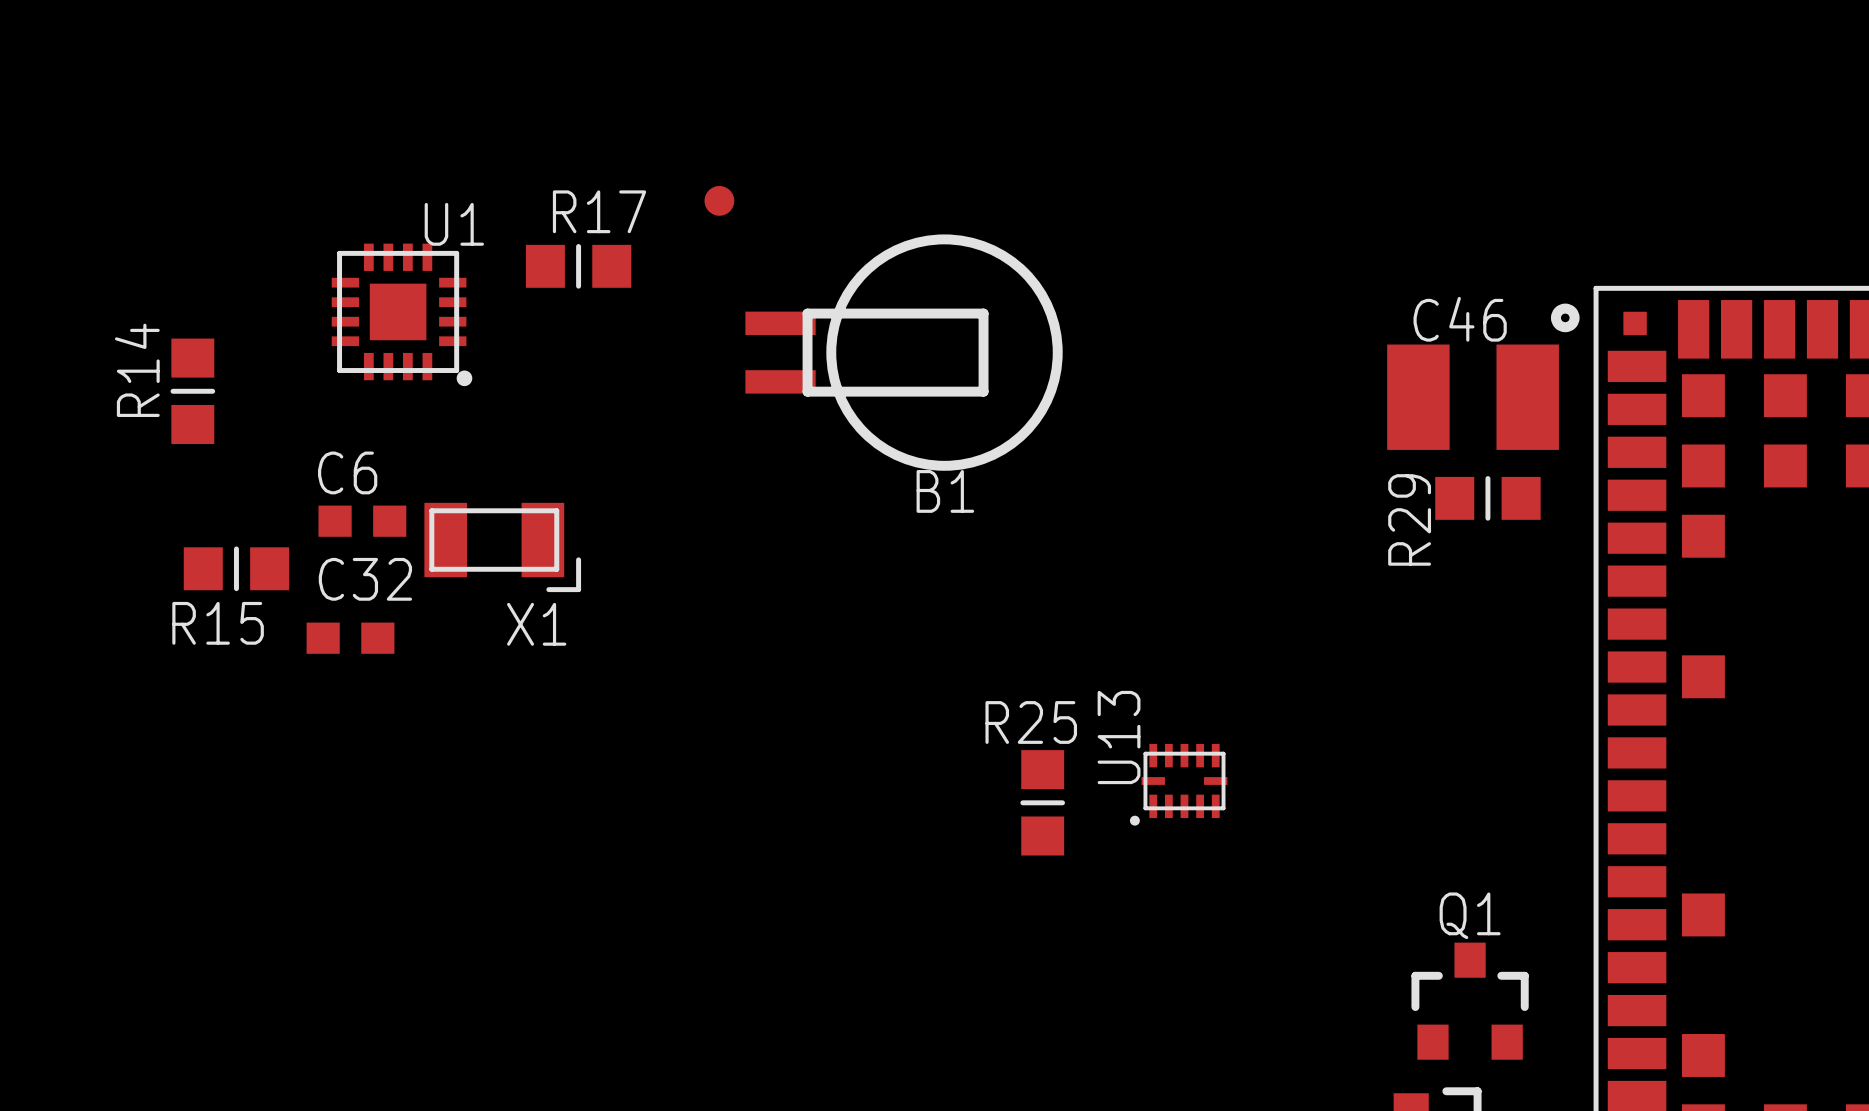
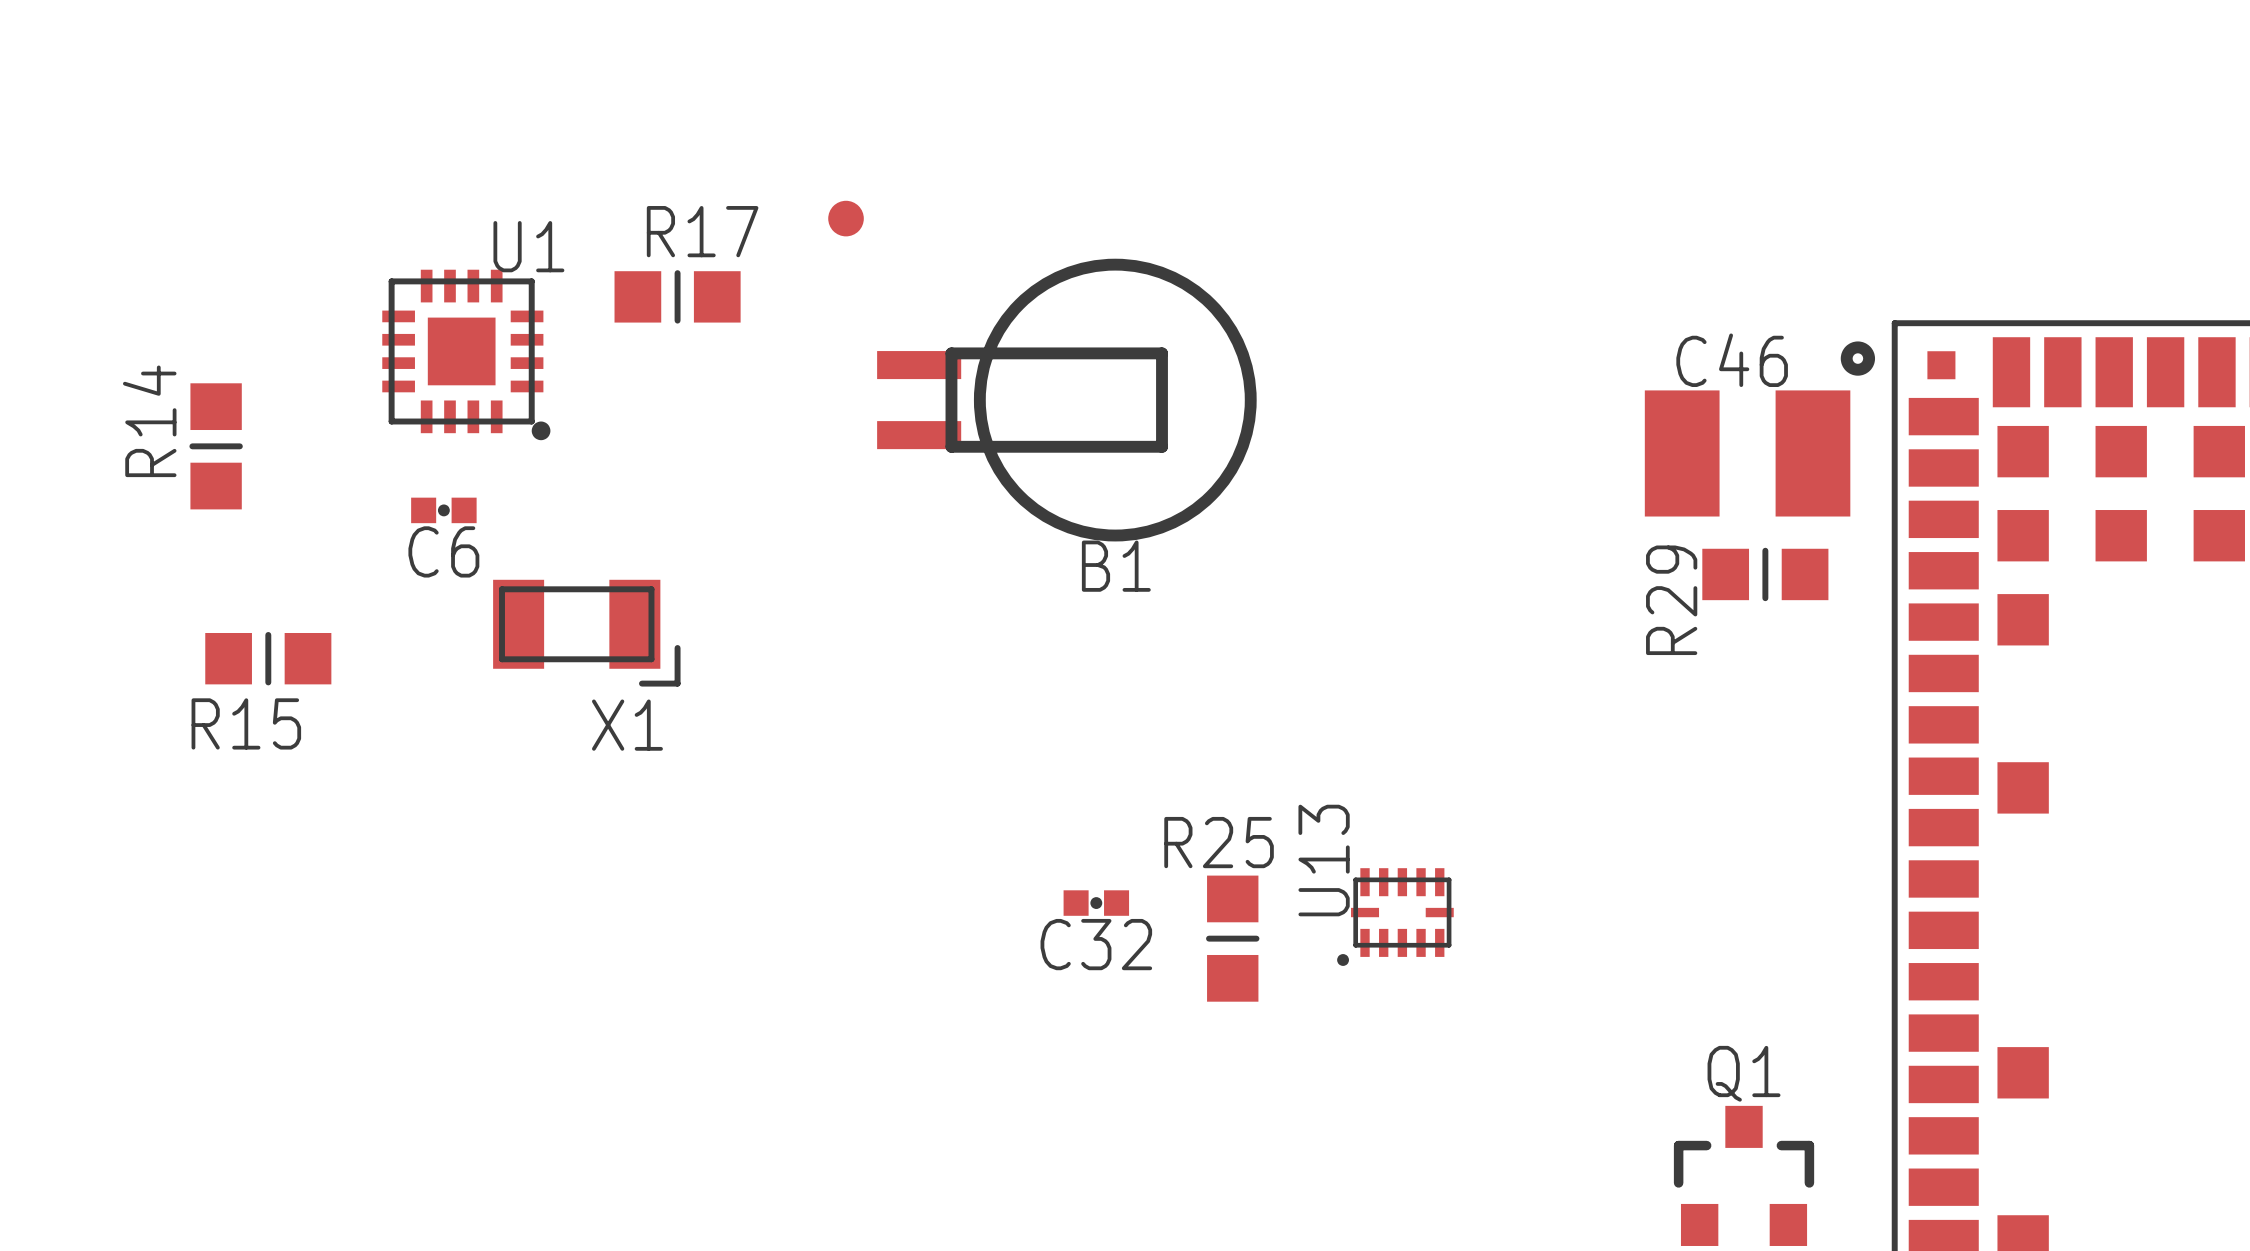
C6 name position: C6 (347, 472) -> C6 (443, 551)
C6 footprint: [318, 505, 407, 537] -> [411, 497, 477, 524]
C32 name position: C32 (365, 579) -> C32 (1096, 944)
C32 footprint: [306, 622, 395, 654] -> [1063, 890, 1130, 916]

